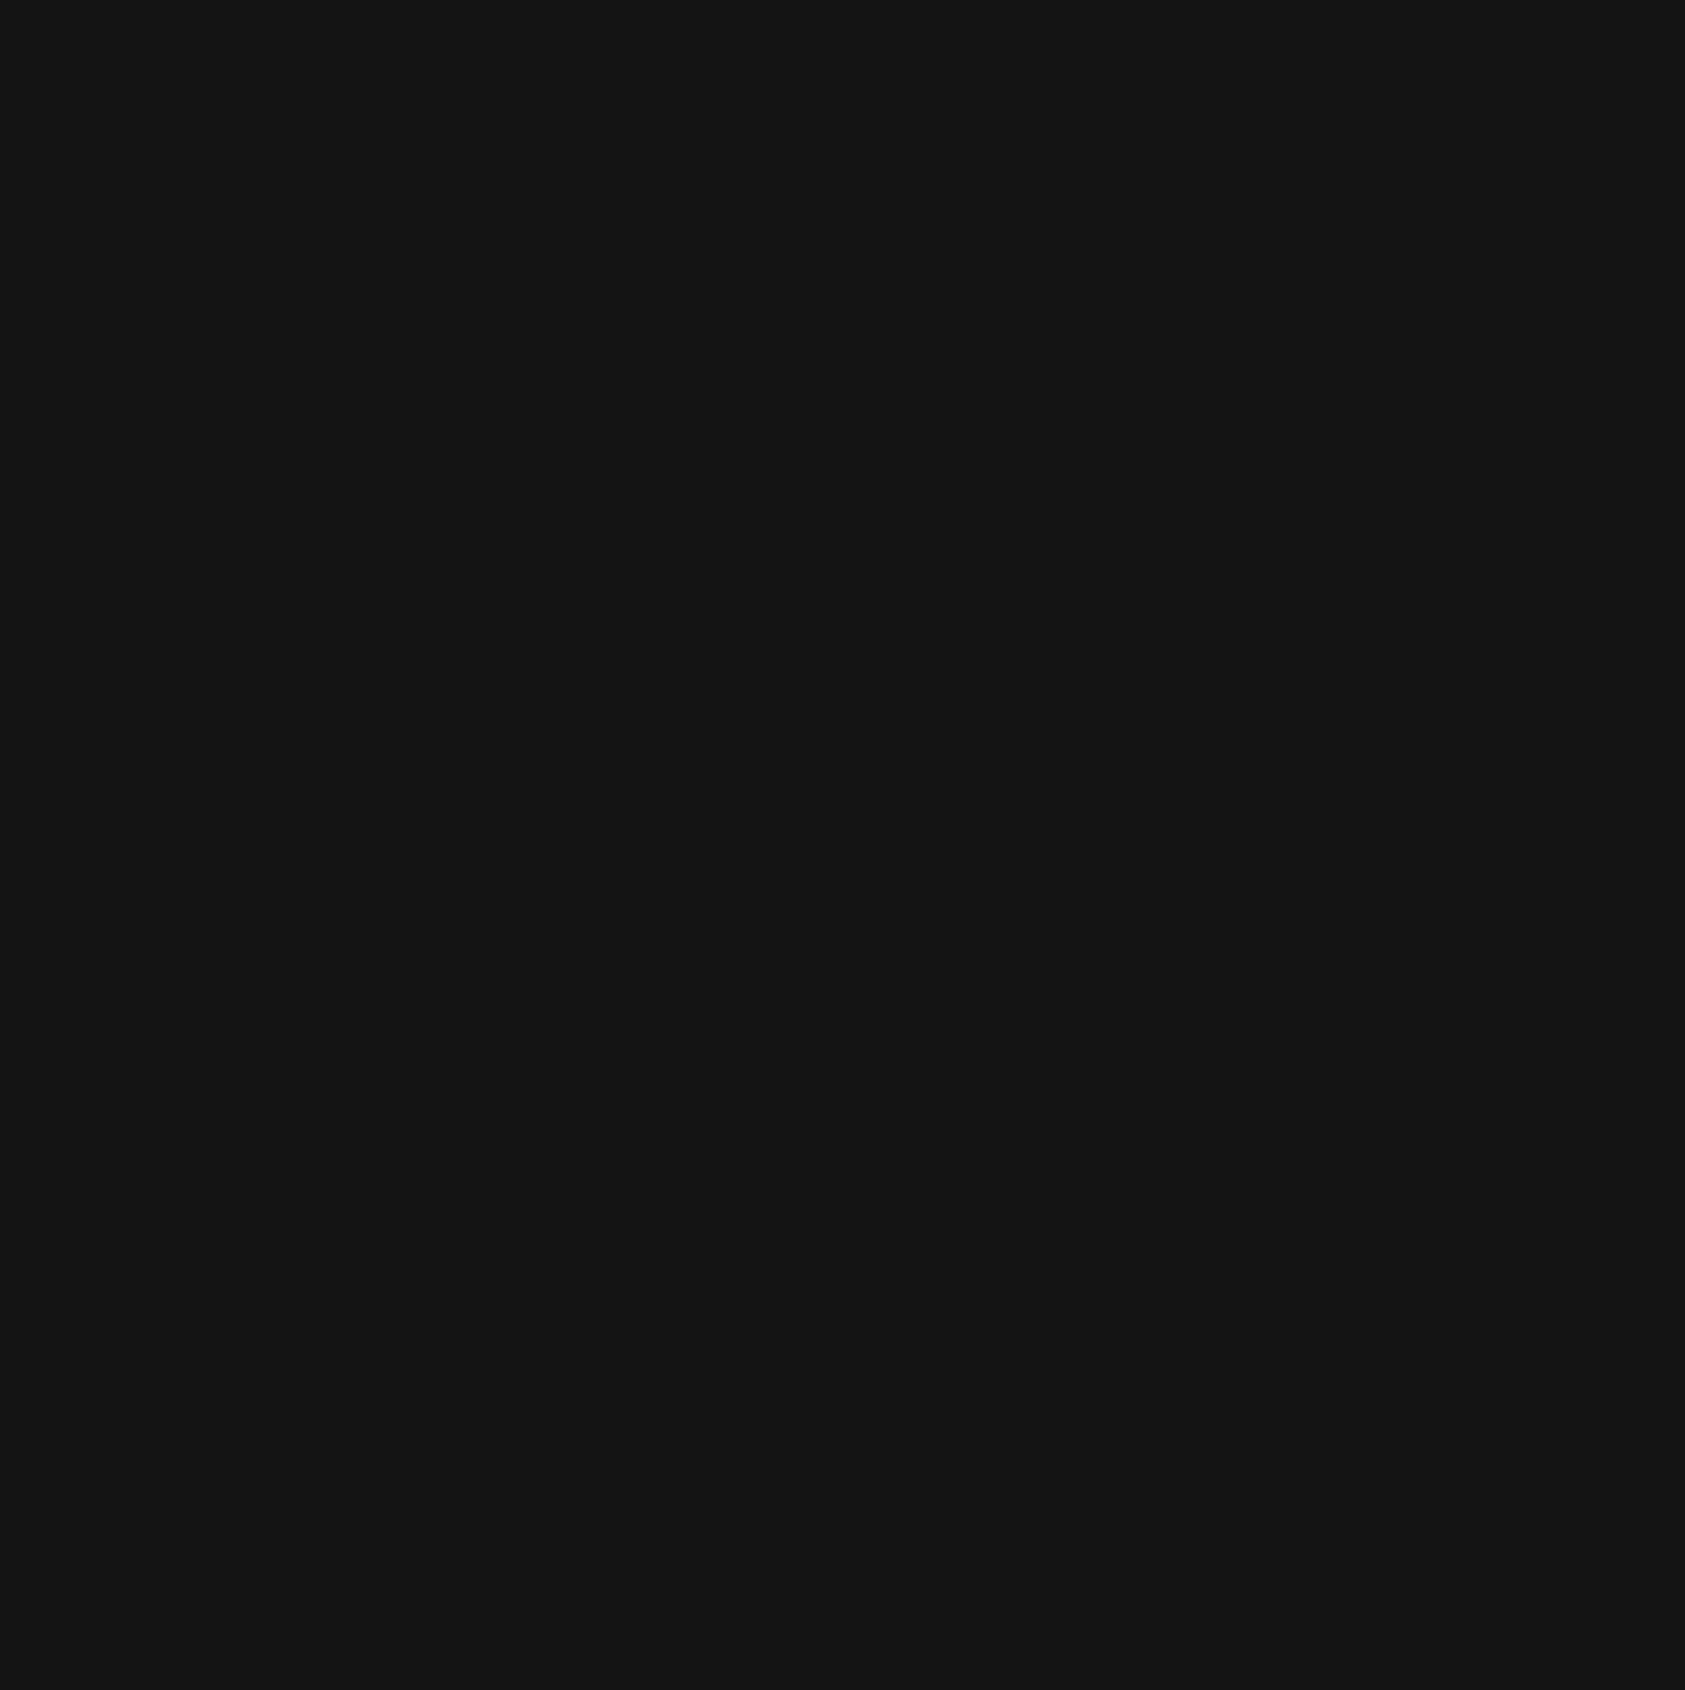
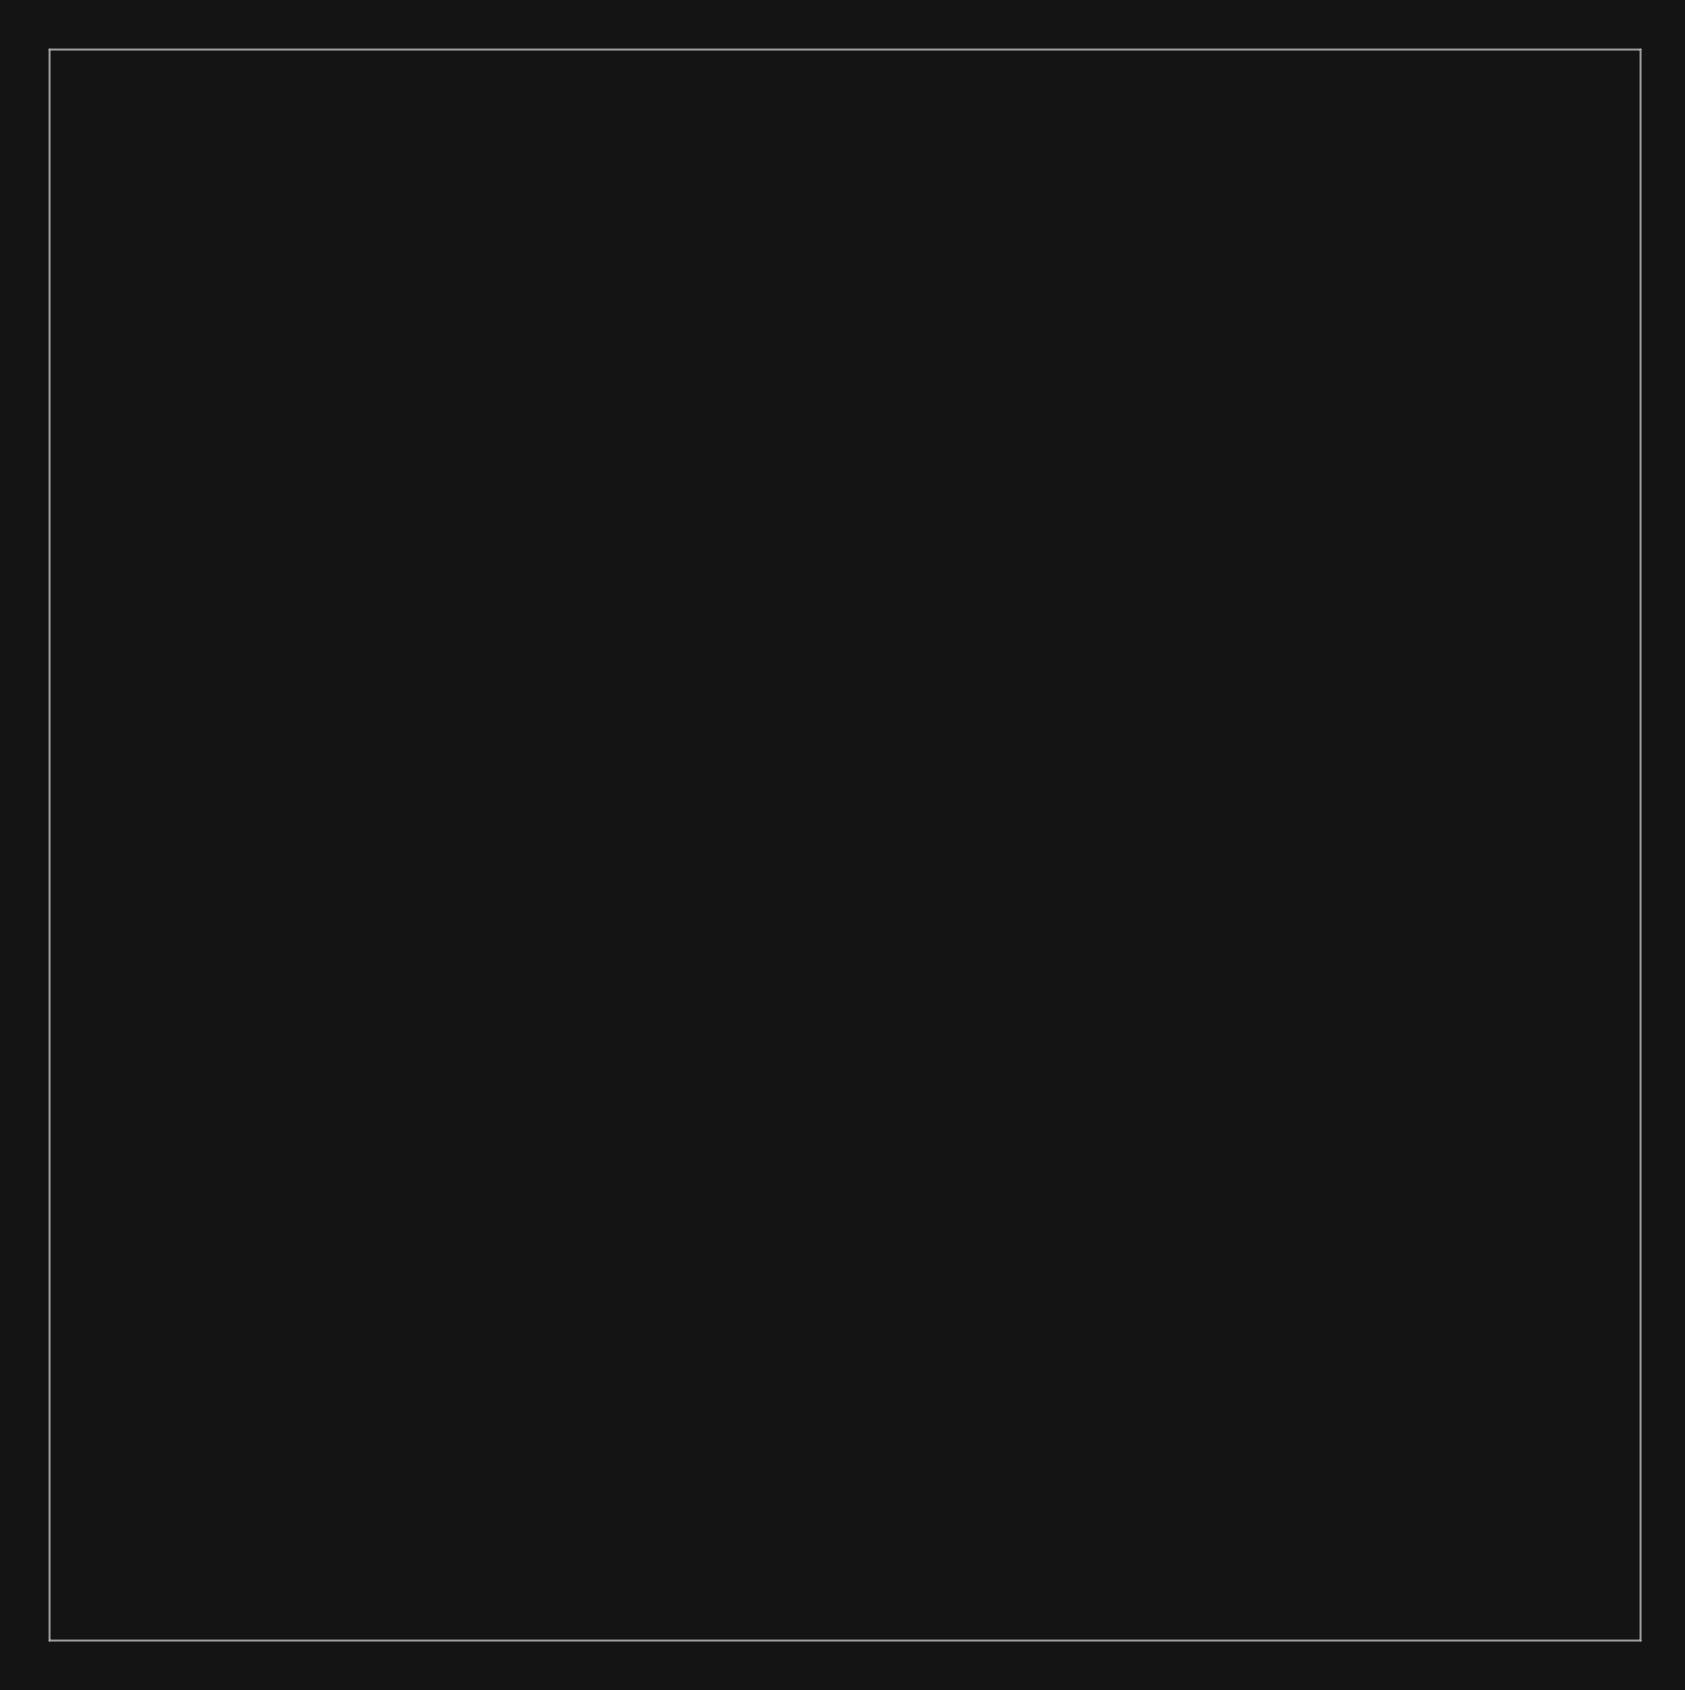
board edge: none -> (1640, 49) (1640, 1640) (49, 1640) (49, 49) (1640, 49)

